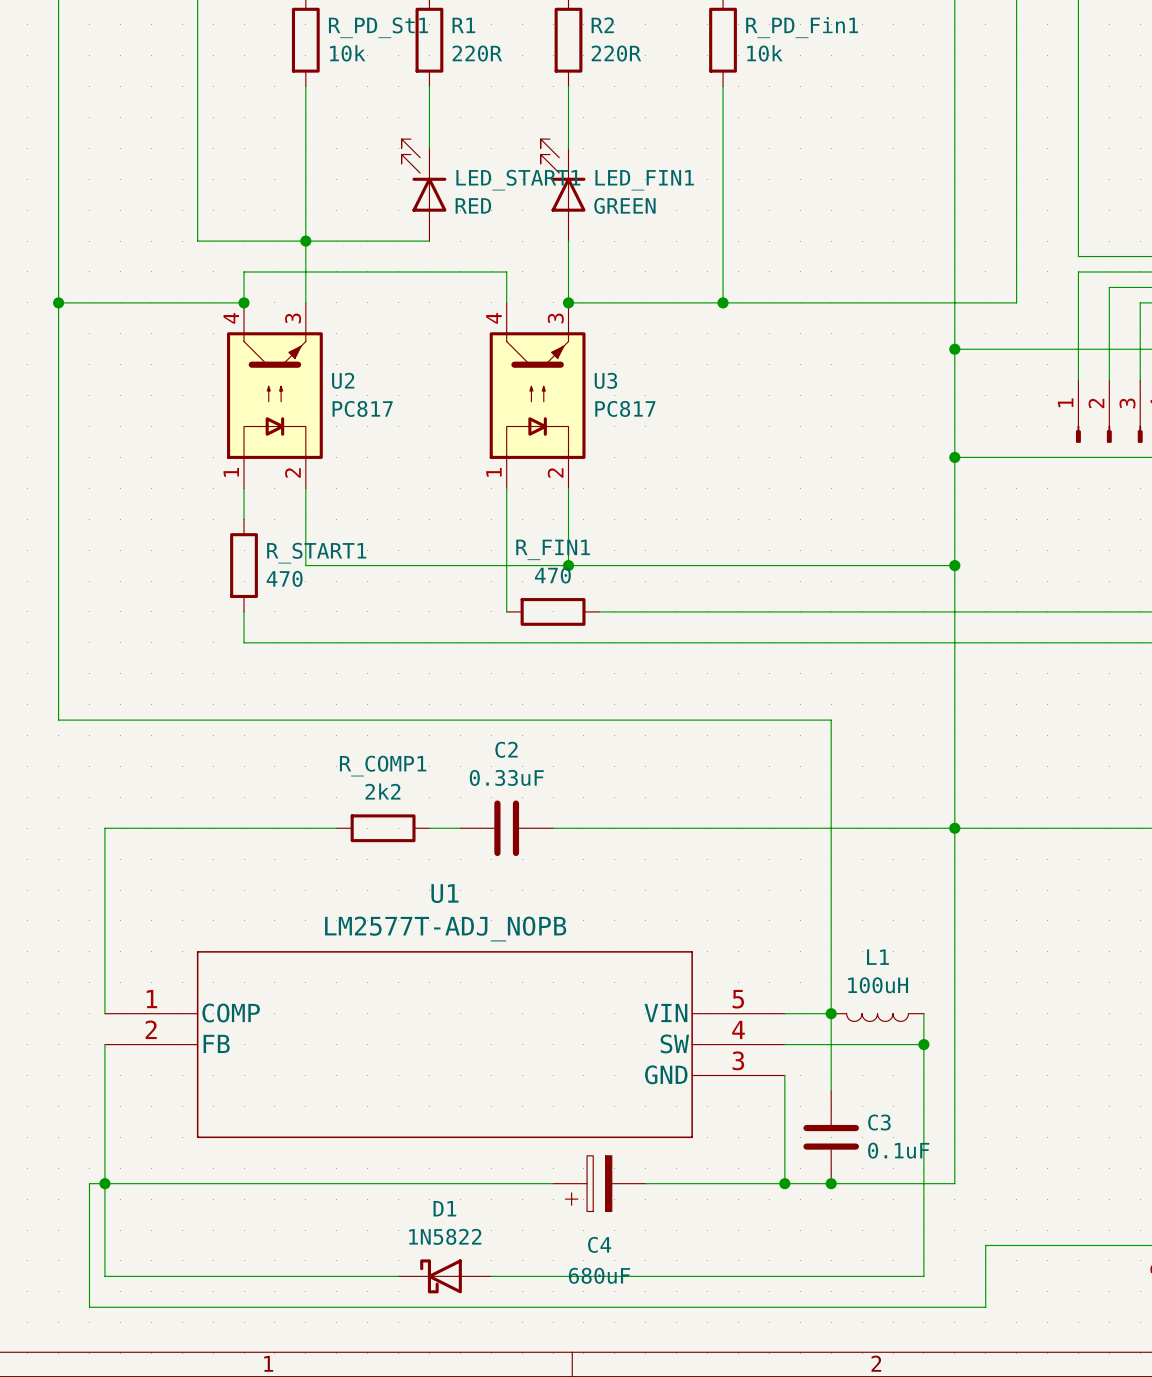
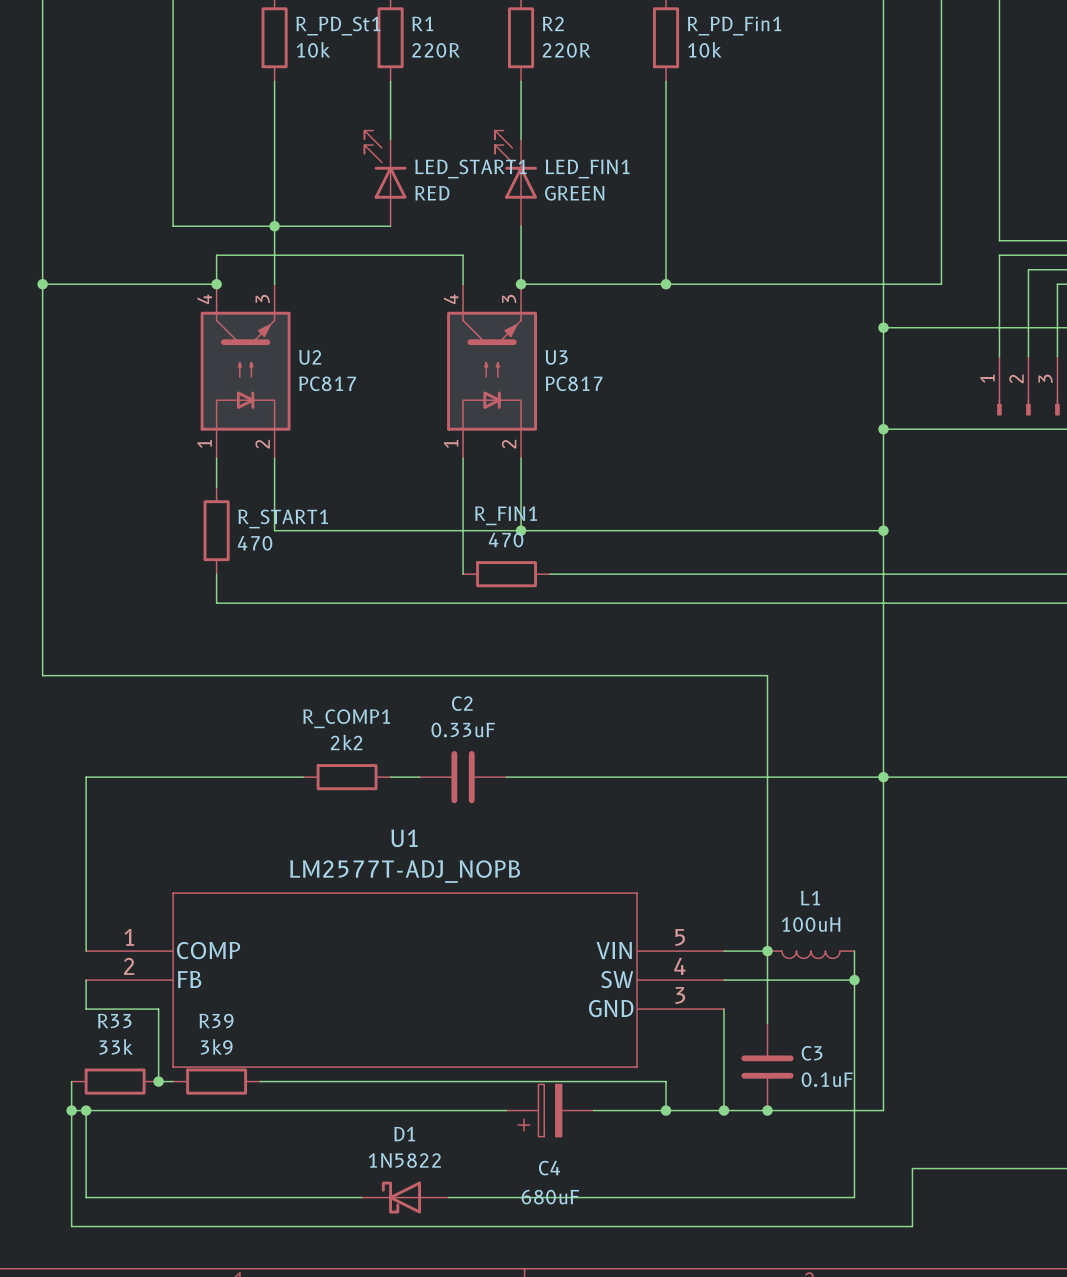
wire: (104, 1075) (104, 1183) -> (86, 1009) (158, 1009) (158, 1081) (173, 1081)
wire: none -> (71, 1081) (71, 1110)
R33: none -> 33k (115, 1081)
junction: none -> (158, 1081)
R39: none -> 3k9 (216, 1081)
wire: none -> (260, 1081) (666, 1081) (666, 1110)
junction: none -> (71, 1110)
junction: none -> (666, 1110)

